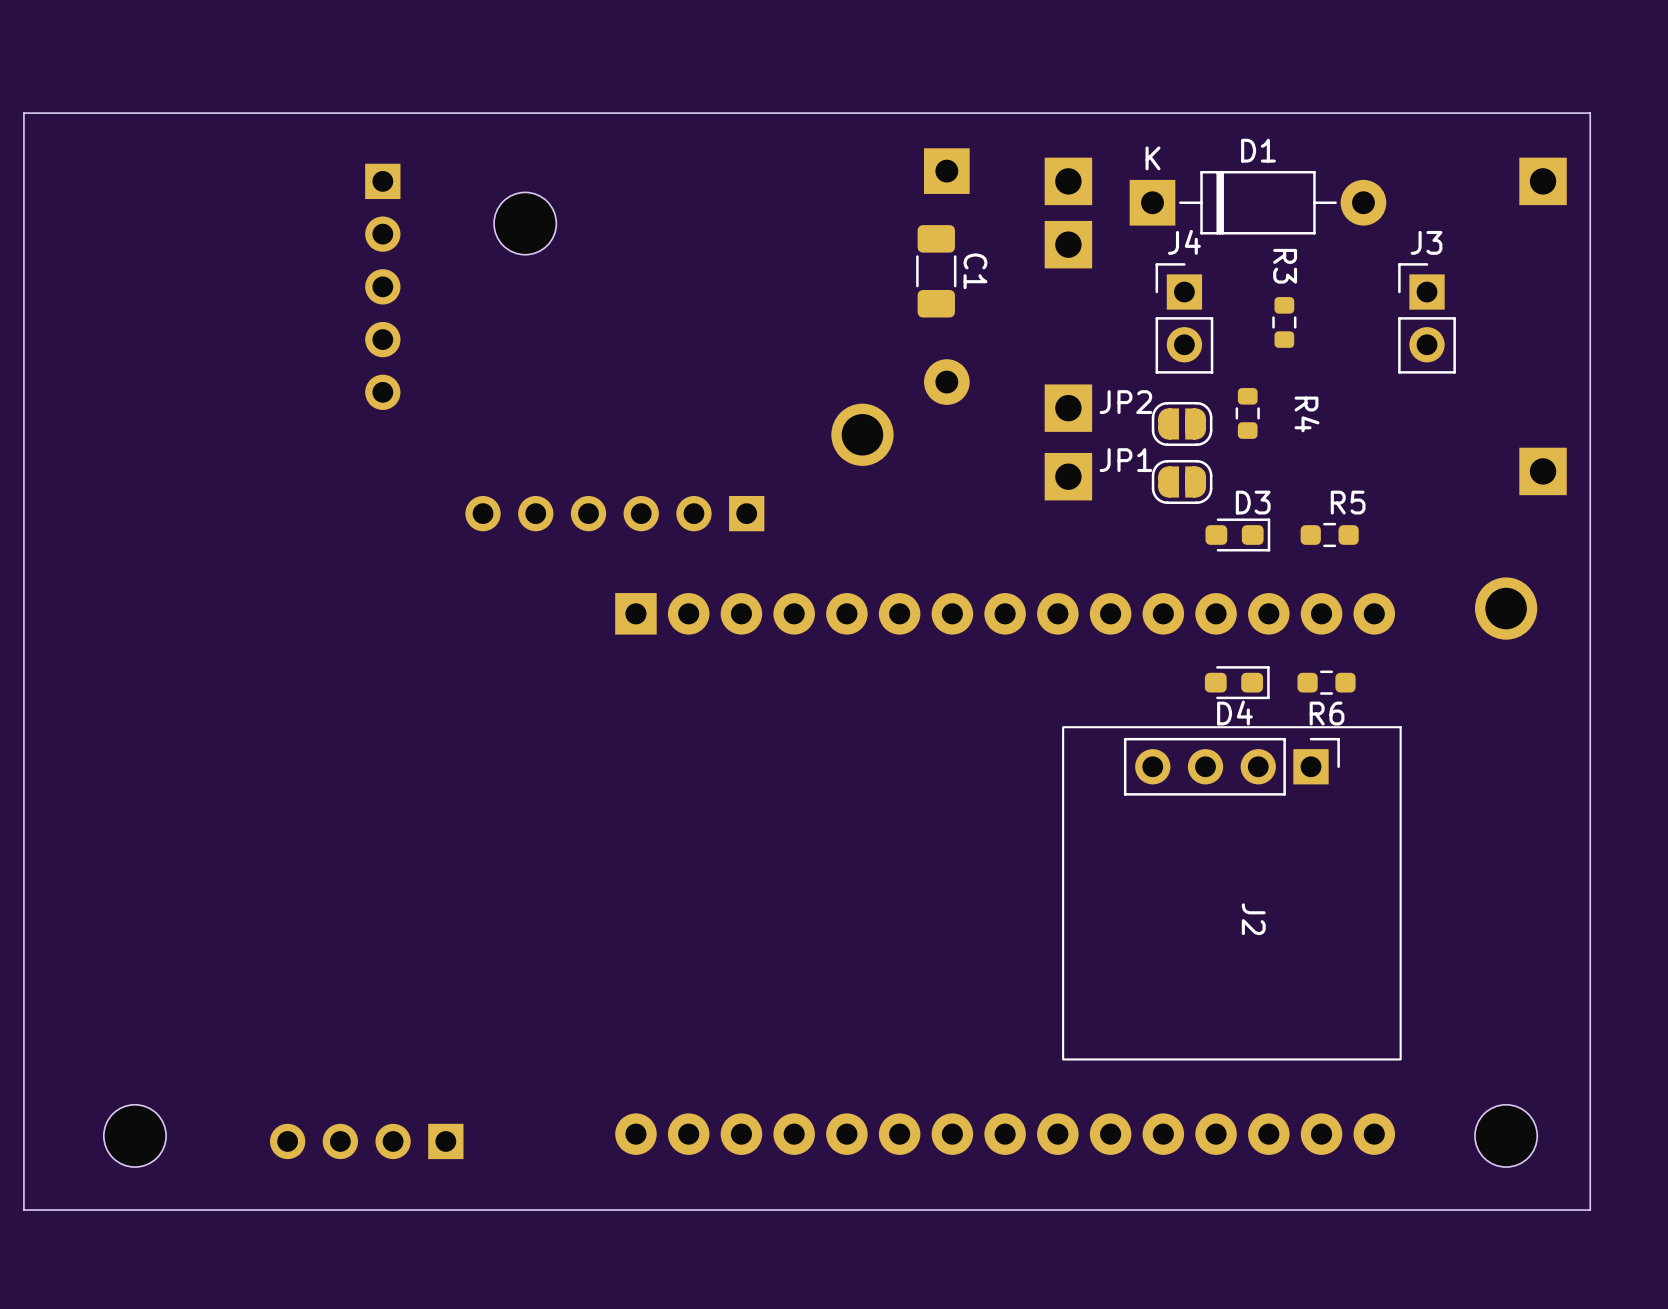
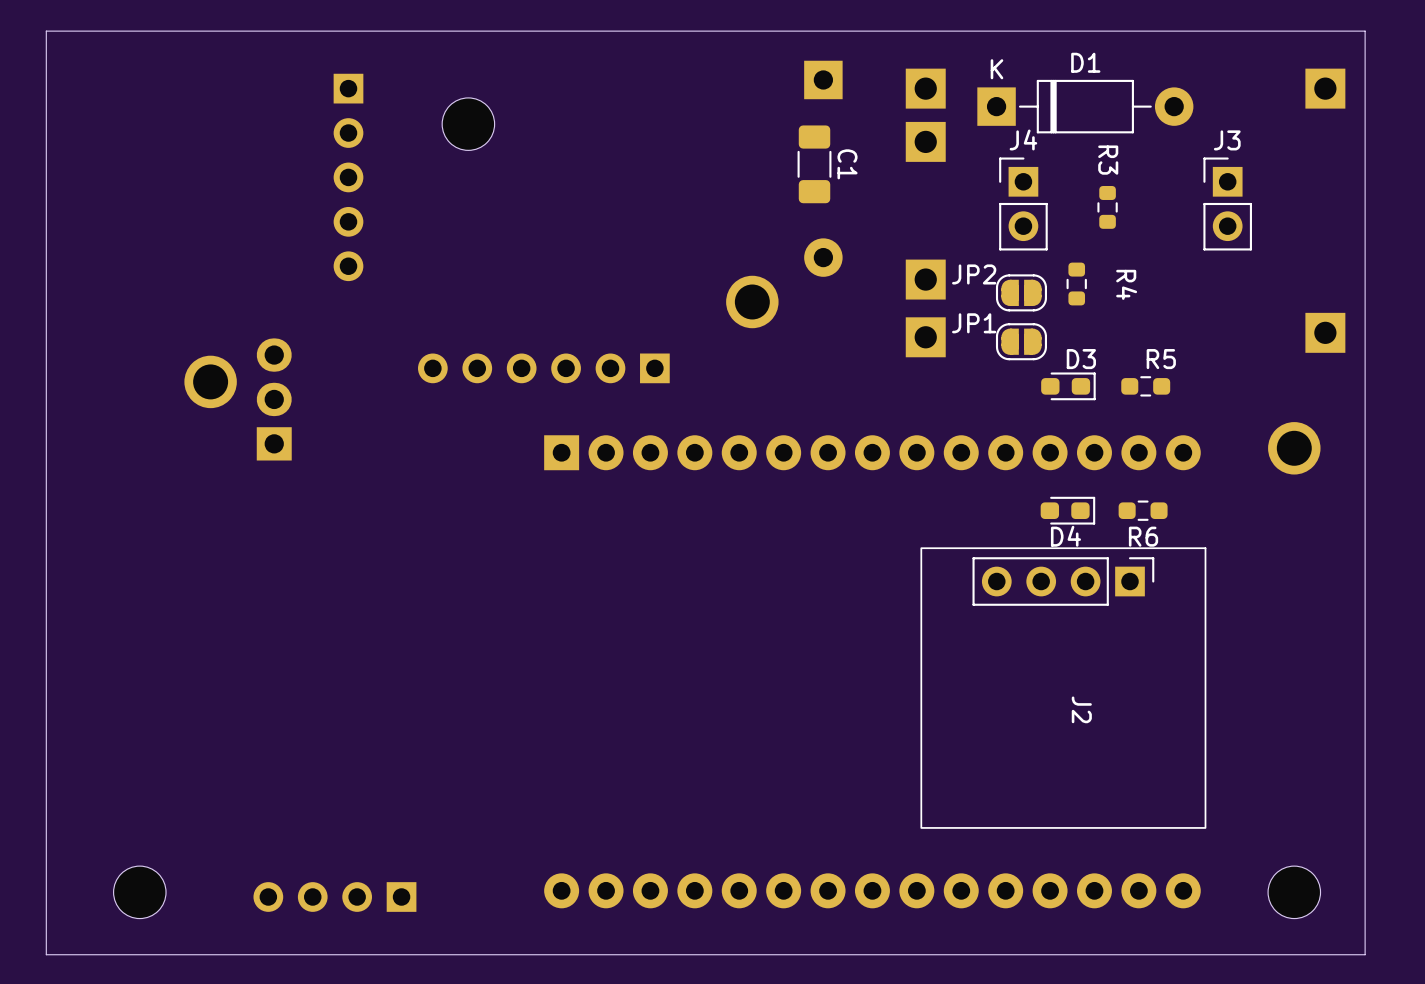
part: none -> (210, 381)
part: none -> (274, 399)

